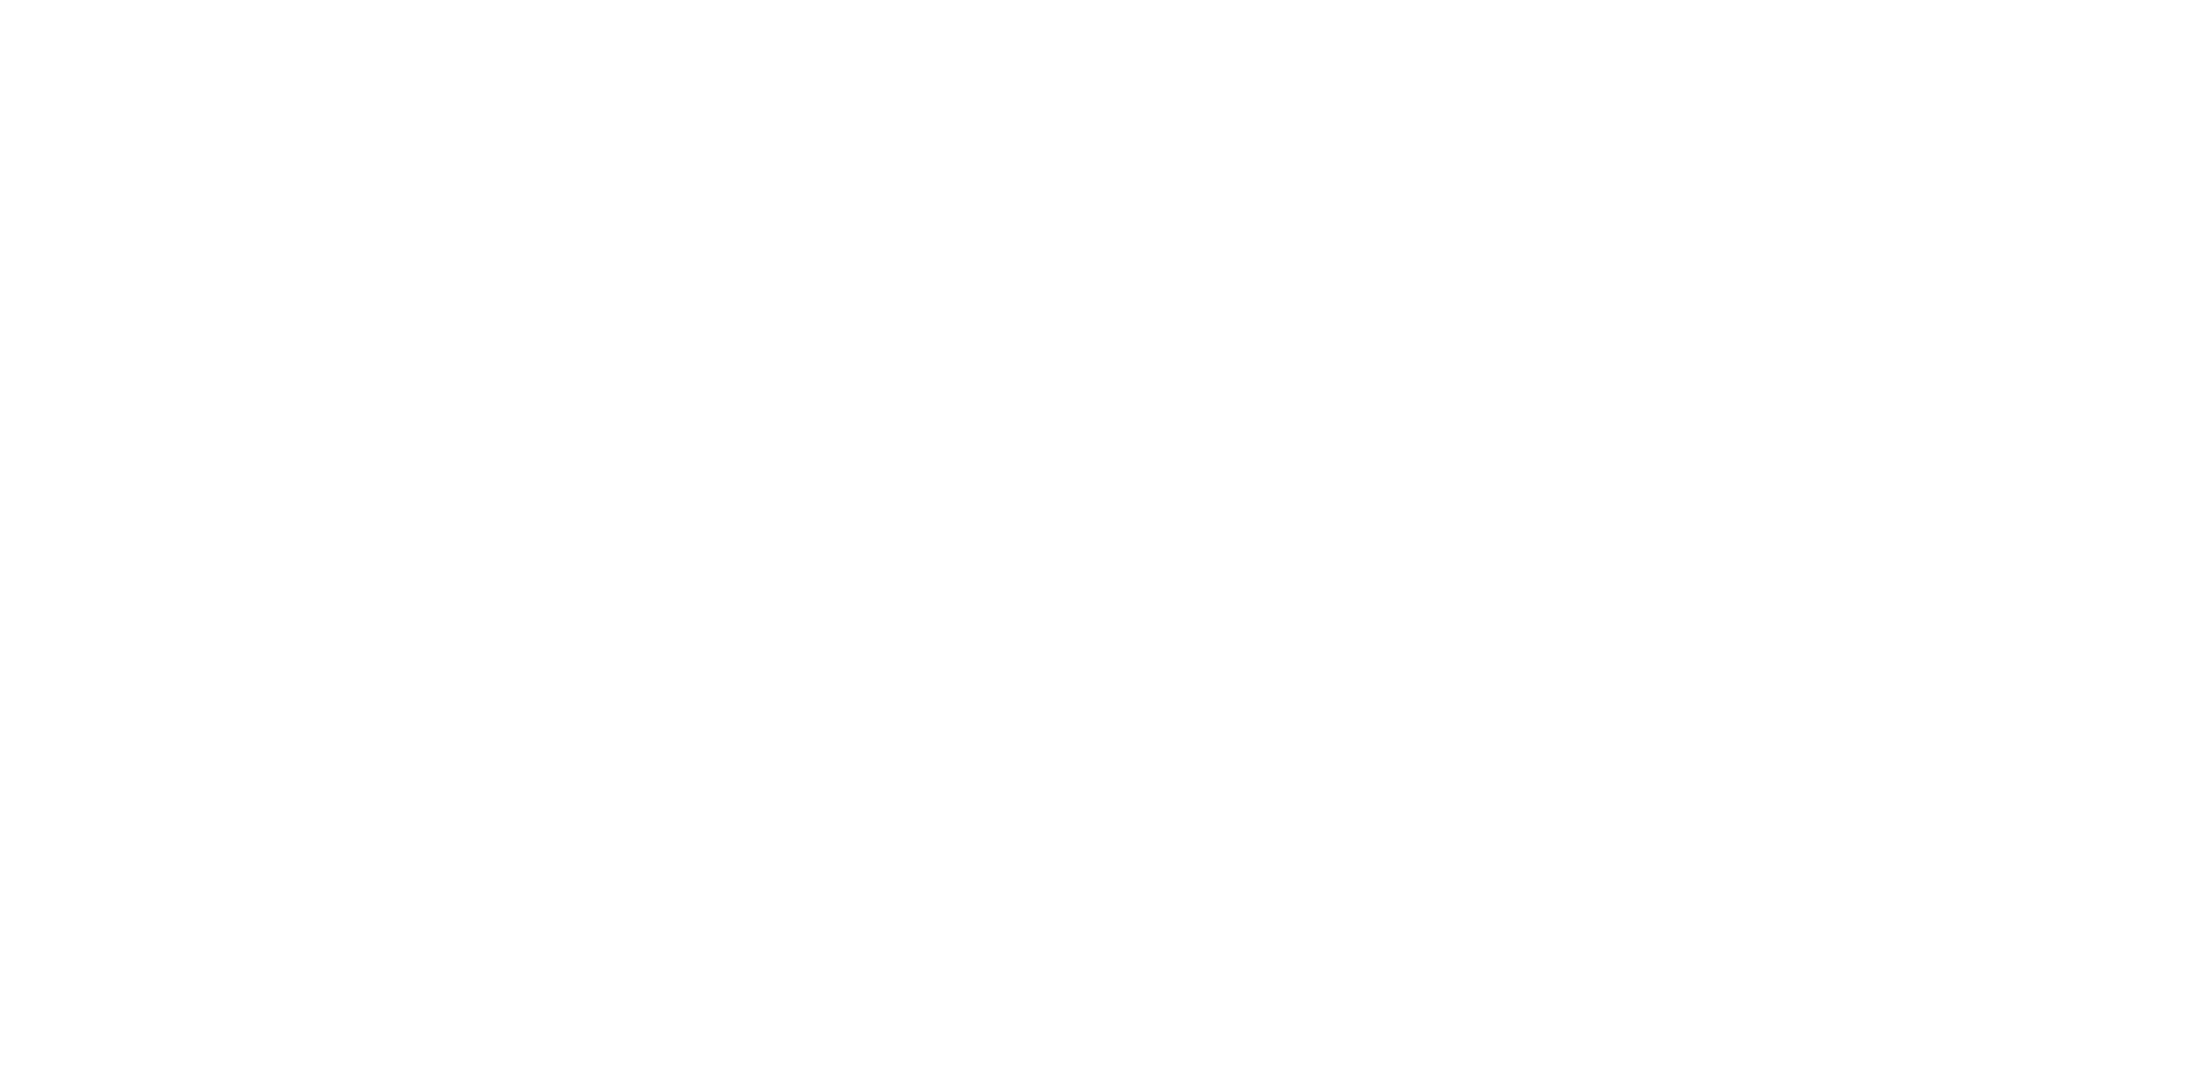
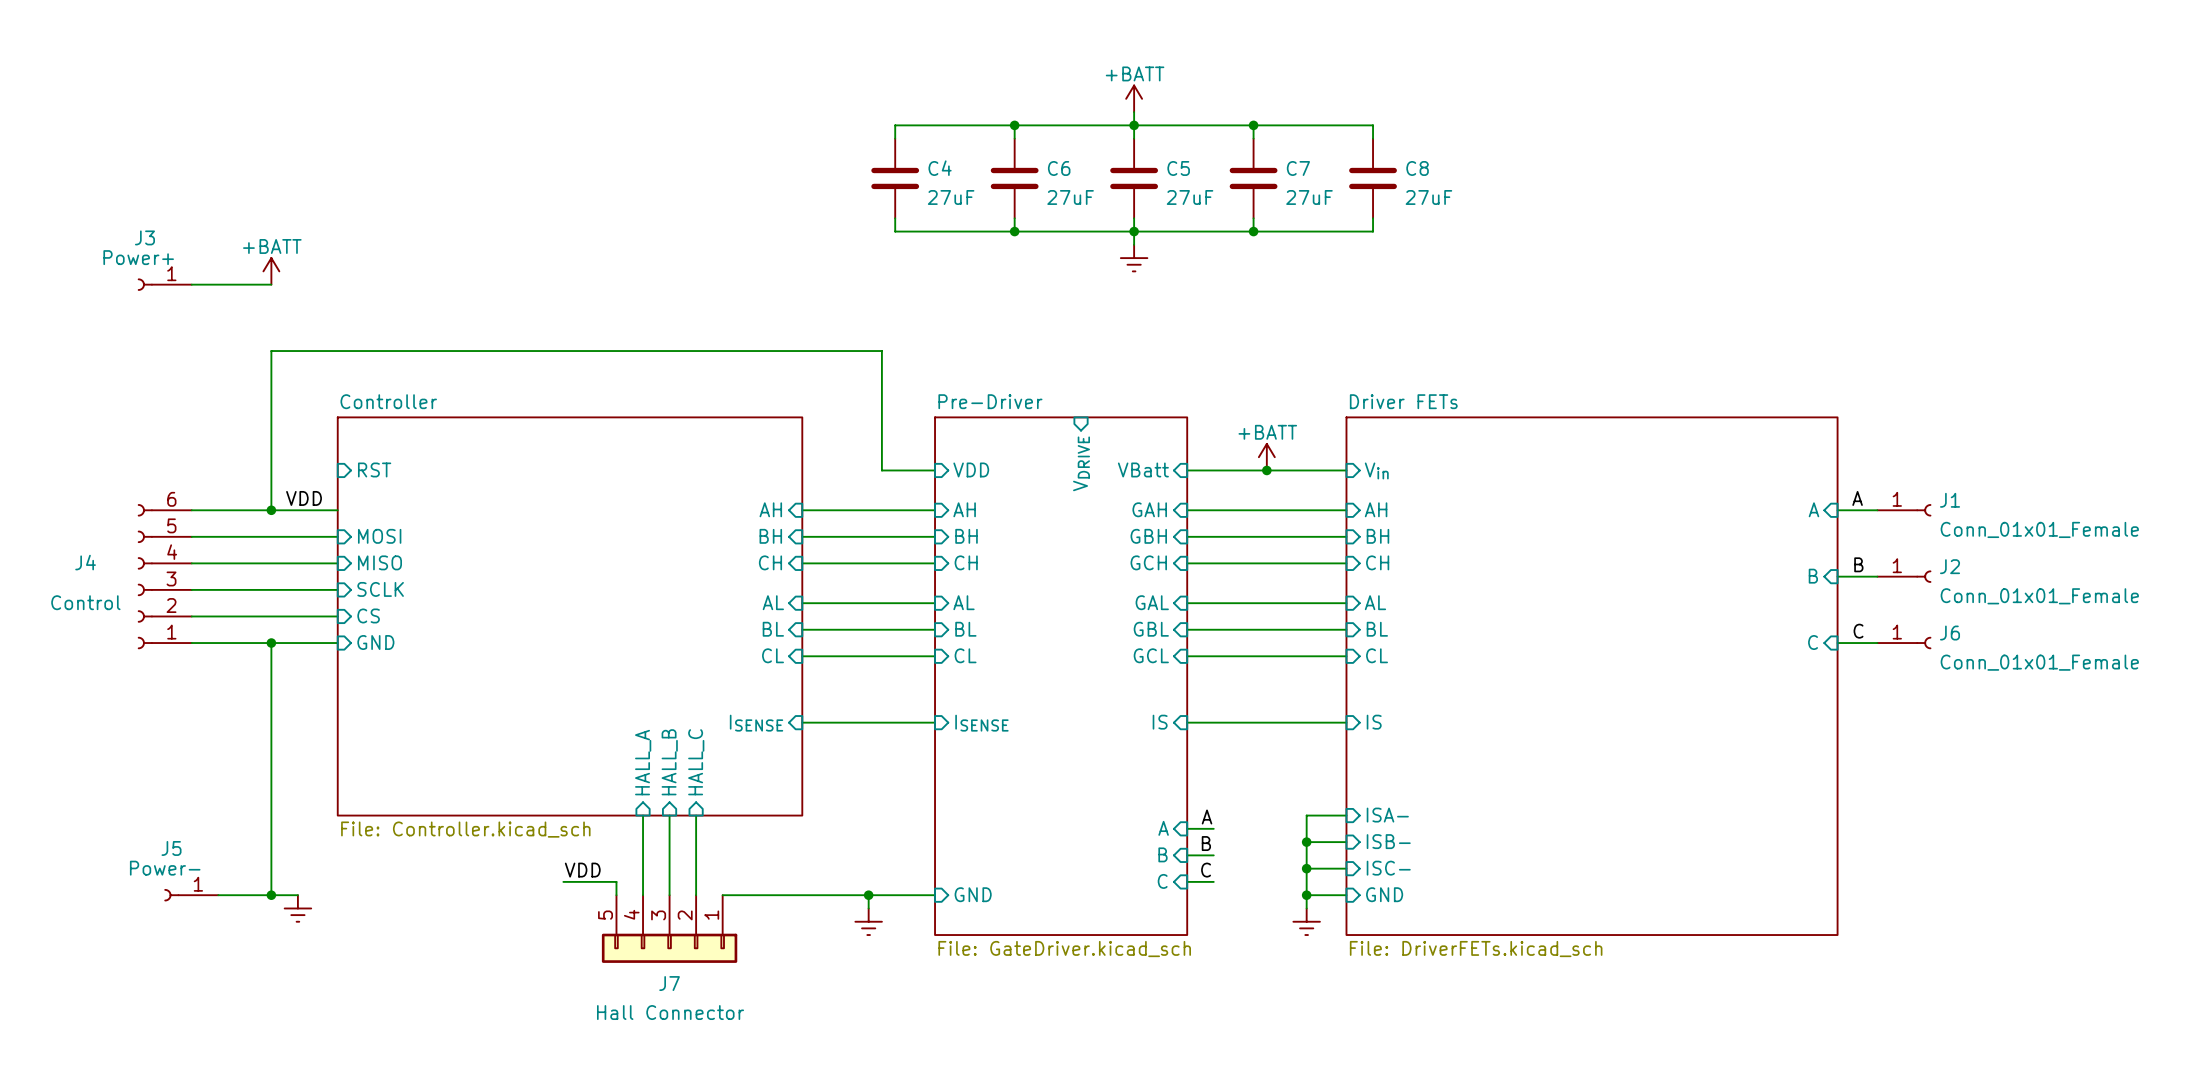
power symbol: none -> +BATT (1134, 98)
wire: none -> (1134, 112) (1134, 138)
wire: none -> (1014, 125) (1014, 138)
junction: none -> (1014, 125)
junction: none -> (1134, 125)
wire: none -> (1253, 125) (1253, 138)
junction: none -> (1253, 125)
wire: none -> (895, 138) (895, 125) (1373, 125) (1373, 138)
C4: none -> 27uF (895, 178)
C6: none -> 27uF (1014, 178)
C5: none -> 27uF (1134, 178)
C7: none -> 27uF (1253, 178)
C8: none -> 27uF (1373, 178)
wire: none -> (895, 218) (895, 231) (1373, 231) (1373, 218)
wire: none -> (1014, 218) (1014, 231)
wire: none -> (1134, 218) (1134, 244)
wire: none -> (1253, 218) (1253, 231)
junction: none -> (1014, 231)
junction: none -> (1134, 231)
junction: none -> (1253, 231)
power symbol: none -> (1134, 258)
power symbol: none -> +BATT (271, 271)
J3: none -> Power+ (164, 284)
wire: none -> (191, 284) (271, 284)
power symbol: none -> +BATT (1266, 457)
sheet pin: none -> VDRIVE (1081, 463)
sheet pin: none -> RST (374, 469)
sheet pin: none -> VDD (971, 469)
sheet pin: none -> VBatt (1143, 469)
wire: none -> (935, 470) (881, 470) (881, 351) (271, 351) (271, 510)
wire: none -> (1187, 470) (1346, 470)
junction: none -> (1266, 470)
sheet pin: none -> Vin (1376, 470)
label: none -> VDD (304, 498)
label: none -> A (1857, 498)
sheet pin: none -> AH (770, 509)
sheet pin: none -> AH (964, 509)
sheet pin: none -> GAH (1149, 509)
sheet pin: none -> AH (1376, 509)
sheet pin: none -> A (1813, 509)
wire: none -> (191, 510) (337, 510)
junction: none -> (271, 510)
wire: none -> (802, 510) (935, 510)
wire: none -> (1187, 510) (1346, 510)
wire: none -> (1837, 510) (1877, 510)
J1: none -> Conn_01x01_Female (1904, 510)
wire: none -> (191, 536) (337, 536)
sheet pin: none -> MOSI (379, 536)
sheet pin: none -> BH (770, 536)
wire: none -> (802, 536) (935, 536)
sheet pin: none -> BH (966, 536)
sheet pin: none -> GBH (1148, 536)
wire: none -> (1187, 536) (1346, 536)
sheet pin: none -> BH (1377, 536)
sheet pin: none -> MISO (379, 562)
sheet pin: none -> CH (770, 562)
sheet pin: none -> CH (966, 562)
sheet pin: none -> GCH (1148, 562)
sheet pin: none -> CH (1377, 562)
wire: none -> (191, 563) (337, 563)
wire: none -> (802, 563) (935, 563)
wire: none -> (1187, 563) (1346, 563)
label: none -> B (1858, 564)
J4: none -> Control (164, 576)
sheet pin: none -> B (1813, 576)
wire: none -> (1837, 576) (1877, 576)
J2: none -> Conn_01x01_Female (1904, 576)
wire: none -> (191, 589) (337, 589)
sheet pin: none -> SCLK (380, 589)
sheet pin: none -> AL (773, 602)
sheet pin: none -> AL (963, 602)
sheet pin: none -> GAL (1152, 602)
sheet pin: none -> AL (1375, 602)
wire: none -> (802, 603) (935, 603)
wire: none -> (1187, 603) (1346, 603)
sheet pin: none -> CS (368, 615)
wire: none -> (191, 616) (337, 616)
sheet Controller: none -> File: Controller.kicad_sch (570, 616)
sheet pin: none -> BL (773, 629)
wire: none -> (802, 629) (935, 629)
sheet pin: none -> BL (965, 629)
sheet pin: none -> GBL (1151, 629)
wire: none -> (1187, 629) (1346, 629)
sheet pin: none -> BL (1377, 629)
label: none -> C (1858, 631)
sheet pin: none -> GND (375, 642)
sheet pin: none -> C (1813, 642)
wire: none -> (191, 643) (337, 643)
wire: none -> (271, 643) (271, 895)
junction: none -> (271, 643)
wire: none -> (1837, 643) (1877, 643)
J6: none -> Conn_01x01_Female (1904, 643)
sheet pin: none -> CL (773, 655)
sheet pin: none -> CL (965, 655)
sheet pin: none -> GCL (1151, 655)
sheet pin: none -> CL (1377, 655)
wire: none -> (802, 656) (935, 656)
wire: none -> (1187, 656) (1346, 656)
sheet Pre-Driver: none -> File: GateDriver.kicad_sch (1061, 676)
sheet Driver FETs: none -> File: DriverFETs.kicad_sch (1592, 676)
wire: none -> (802, 722) (935, 722)
sheet pin: none -> IS (1160, 722)
wire: none -> (1187, 722) (1346, 722)
sheet pin: none -> IS (1374, 722)
sheet pin: none -> ISENSE (756, 723)
sheet pin: none -> ISENSE (981, 723)
sheet pin: none -> HALL_A (643, 762)
sheet pin: none -> HALL_B (669, 762)
sheet pin: none -> HALL_C (696, 762)
wire: none -> (643, 815) (643, 895)
wire: none -> (669, 815) (669, 895)
wire: none -> (696, 815) (696, 895)
wire: none -> (1346, 815) (1306, 815) (1306, 908)
sheet pin: none -> ISA- (1387, 815)
label: none -> A (1207, 816)
sheet pin: none -> A (1163, 828)
wire: none -> (1187, 828) (1213, 828)
sheet pin: none -> ISB- (1388, 841)
wire: none -> (1306, 842) (1346, 842)
junction: none -> (1306, 842)
label: none -> B (1206, 843)
sheet pin: none -> B (1162, 854)
wire: none -> (1187, 855) (1213, 855)
wire: none -> (1306, 868) (1346, 868)
junction: none -> (1306, 868)
sheet pin: none -> ISC- (1388, 868)
label: none -> VDD (582, 870)
label: none -> C (1206, 870)
wire: none -> (563, 881) (616, 881) (616, 895)
sheet pin: none -> C (1162, 881)
wire: none -> (1187, 881) (1213, 881)
sheet pin: none -> GND (973, 894)
sheet pin: none -> GND (1384, 894)
J5: none -> Power- (191, 895)
wire: none -> (218, 895) (297, 895)
junction: none -> (271, 895)
wire: none -> (722, 895) (935, 895)
wire: none -> (868, 895) (868, 908)
junction: none -> (868, 895)
wire: none -> (1306, 895) (1346, 895)
junction: none -> (1306, 895)
power symbol: none -> (297, 908)
power symbol: none -> (868, 921)
power symbol: none -> (1306, 921)
J7: none -> Hall Connector (669, 929)

